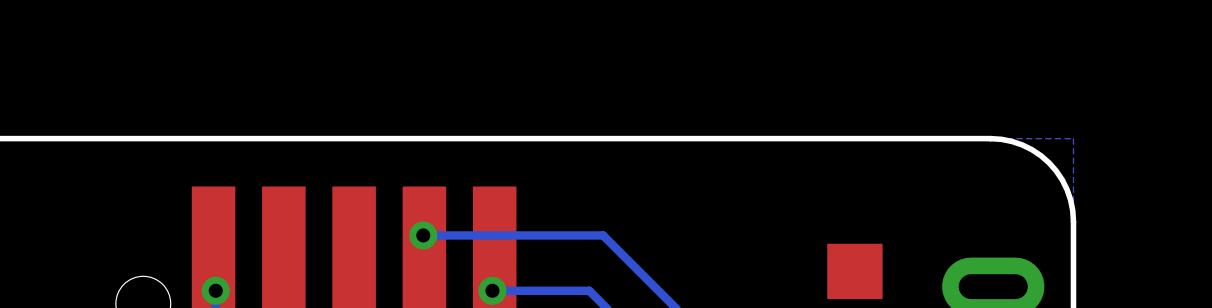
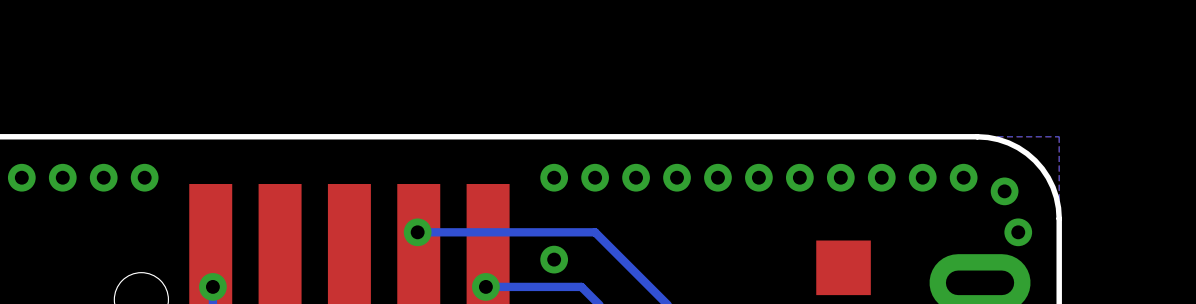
via: none -> (21, 177)
via: none -> (62, 177)
via: none -> (103, 177)
via: none -> (144, 177)
via: none -> (554, 177)
via: none -> (595, 177)
via: none -> (636, 177)
via: none -> (677, 177)
via: none -> (717, 177)
via: none -> (758, 177)
via: none -> (799, 177)
via: none -> (840, 177)
via: none -> (881, 177)
via: none -> (922, 177)
via: none -> (963, 177)
via: none -> (1004, 191)
via: none -> (1018, 232)
via: none -> (554, 259)

